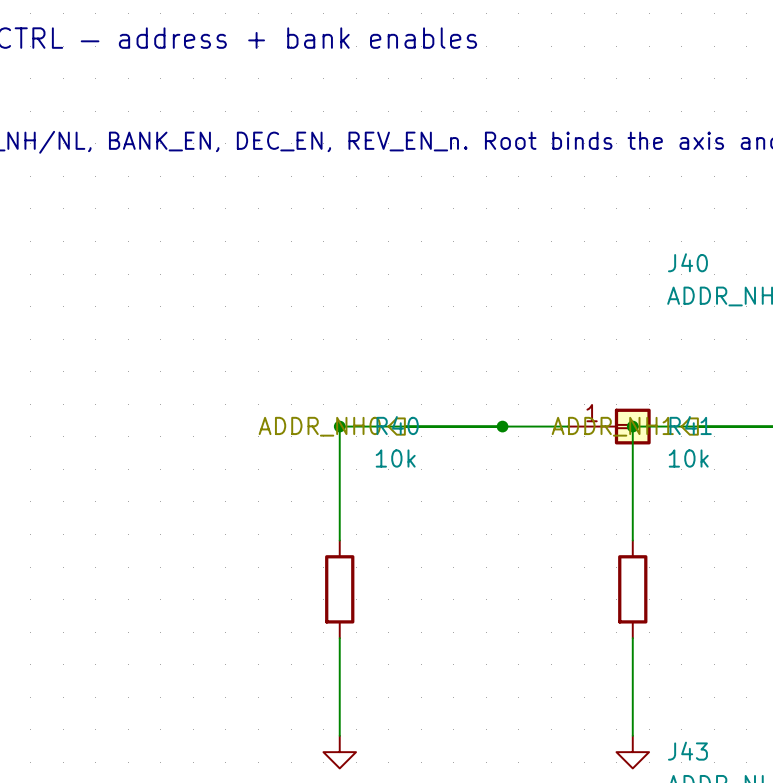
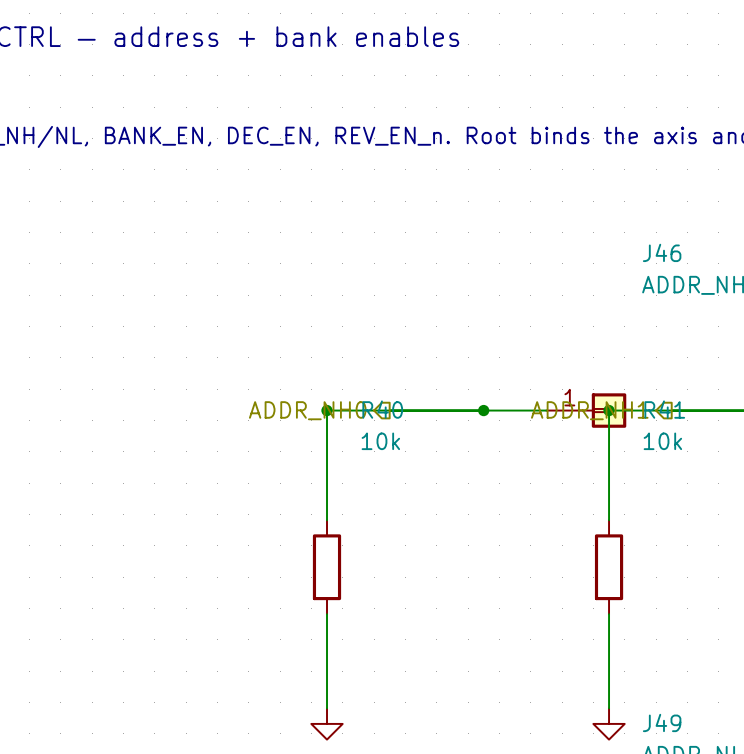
J40 name: J40 (687, 262) -> J46 (662, 252)
J43 name: J43 (687, 751) -> J49 (662, 722)

